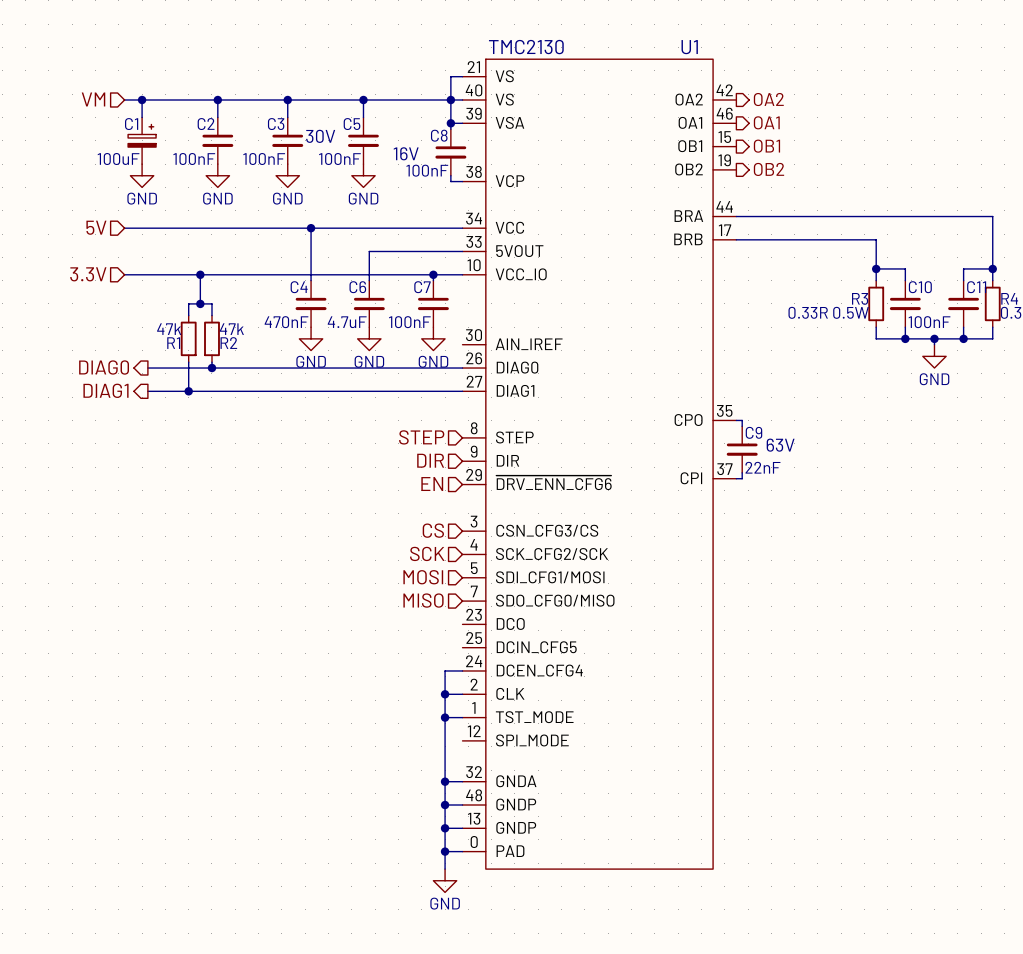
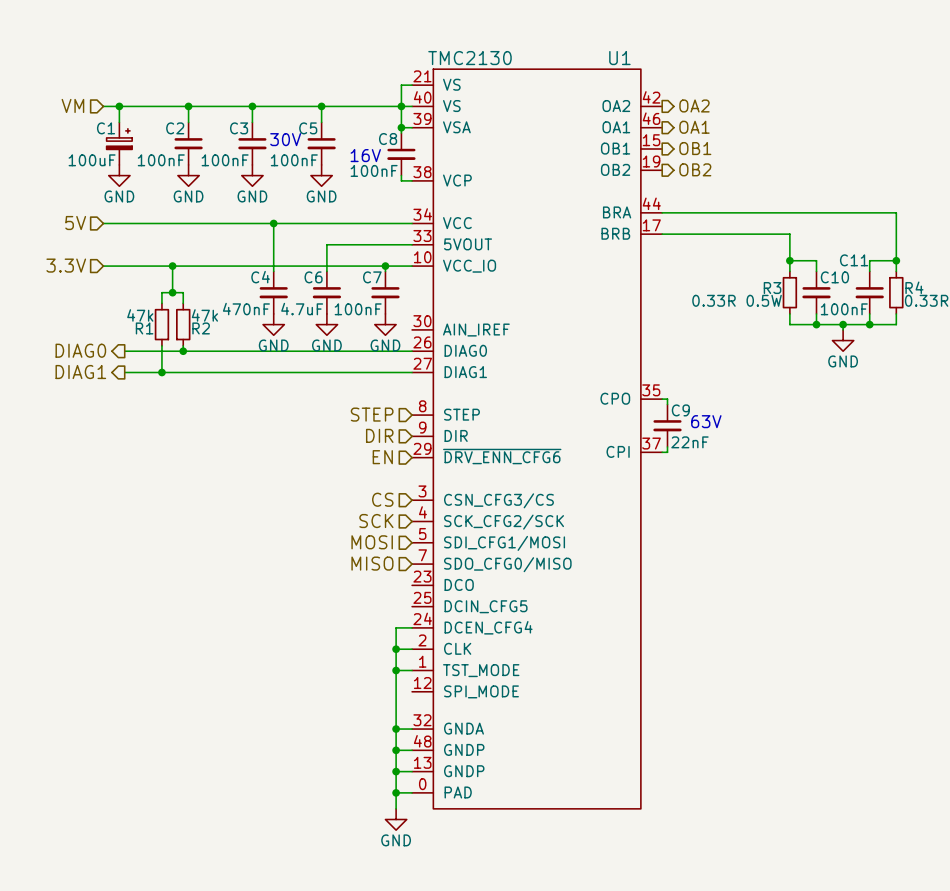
C11 name position: C11 (976, 287) -> C11 (854, 260)

